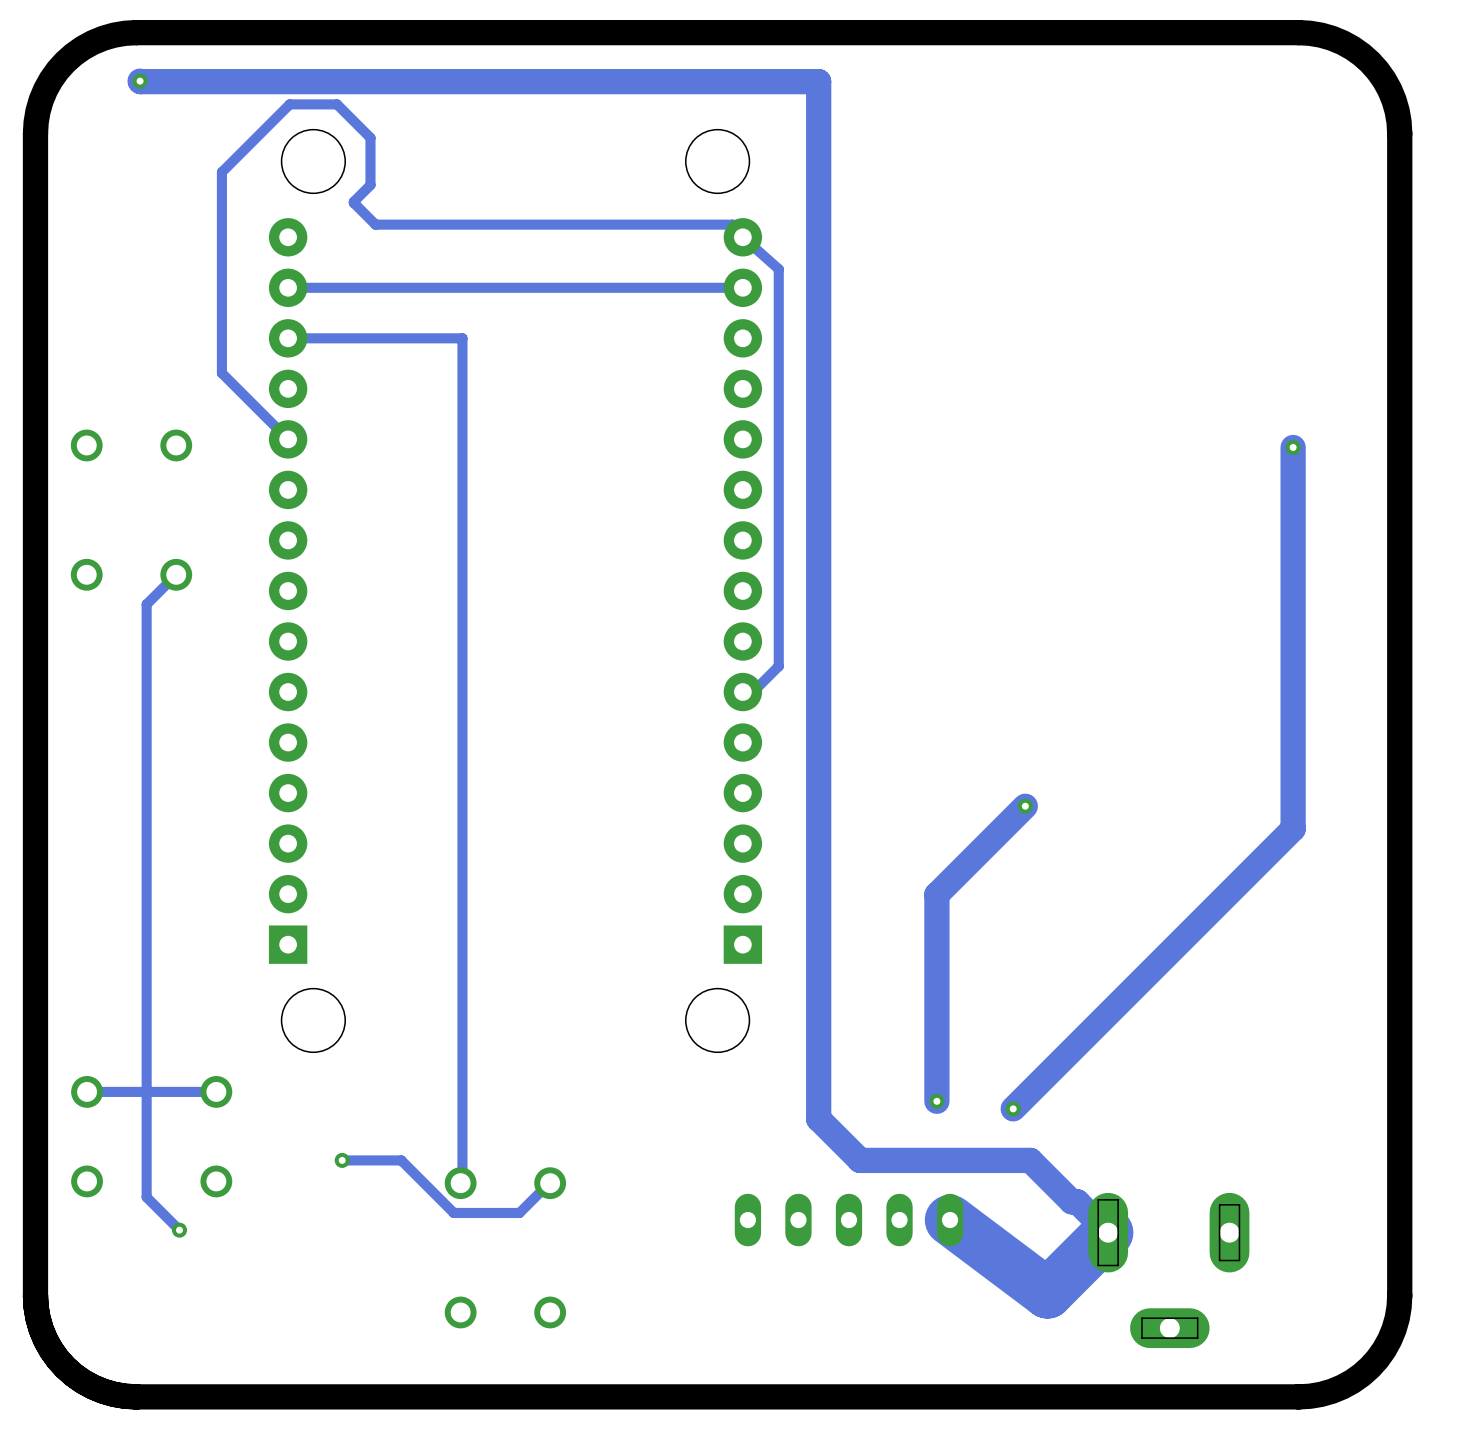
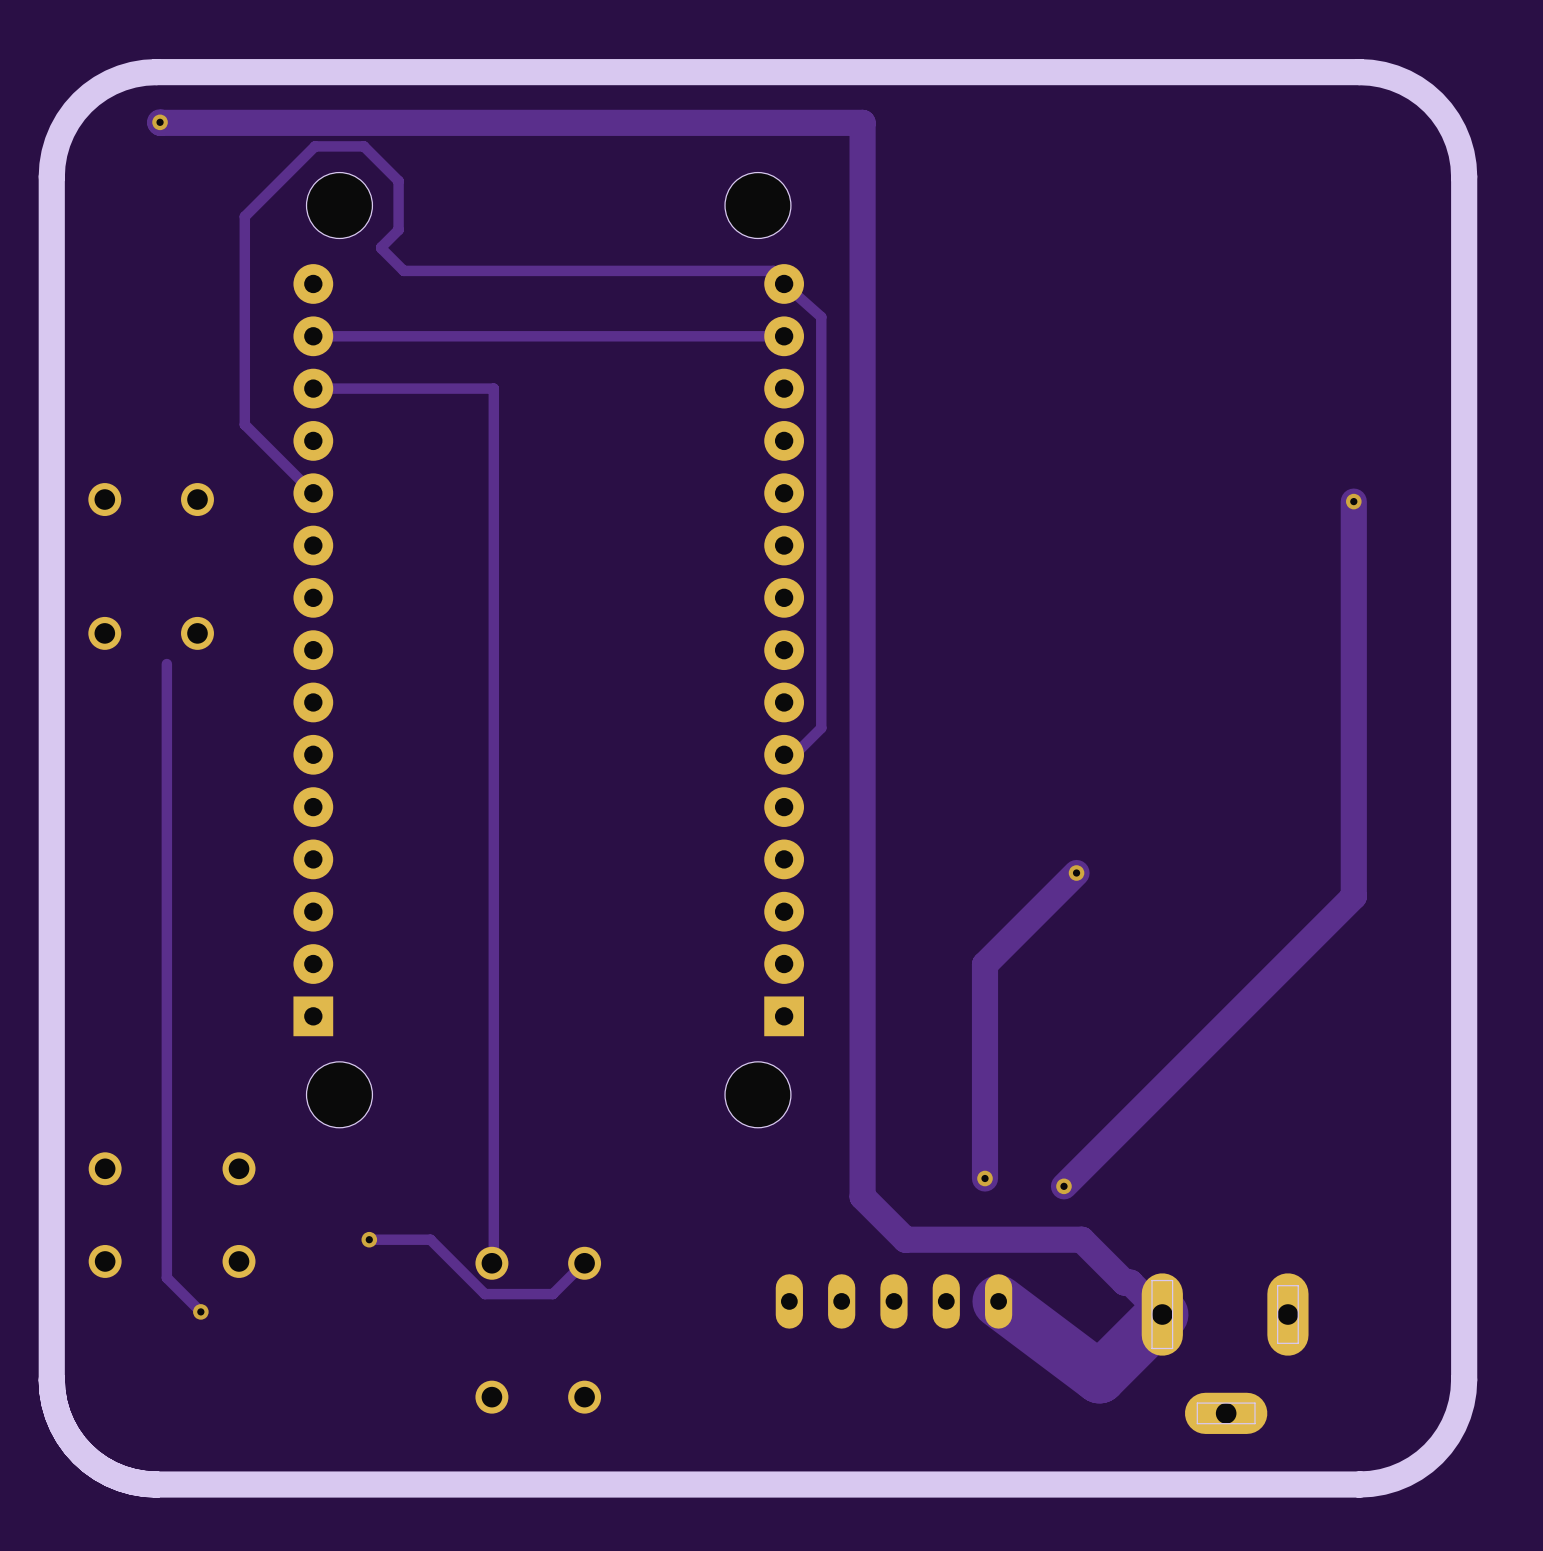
track: (176, 574) (146, 604) -> none
track: (216, 1091) (87, 1091) -> none

